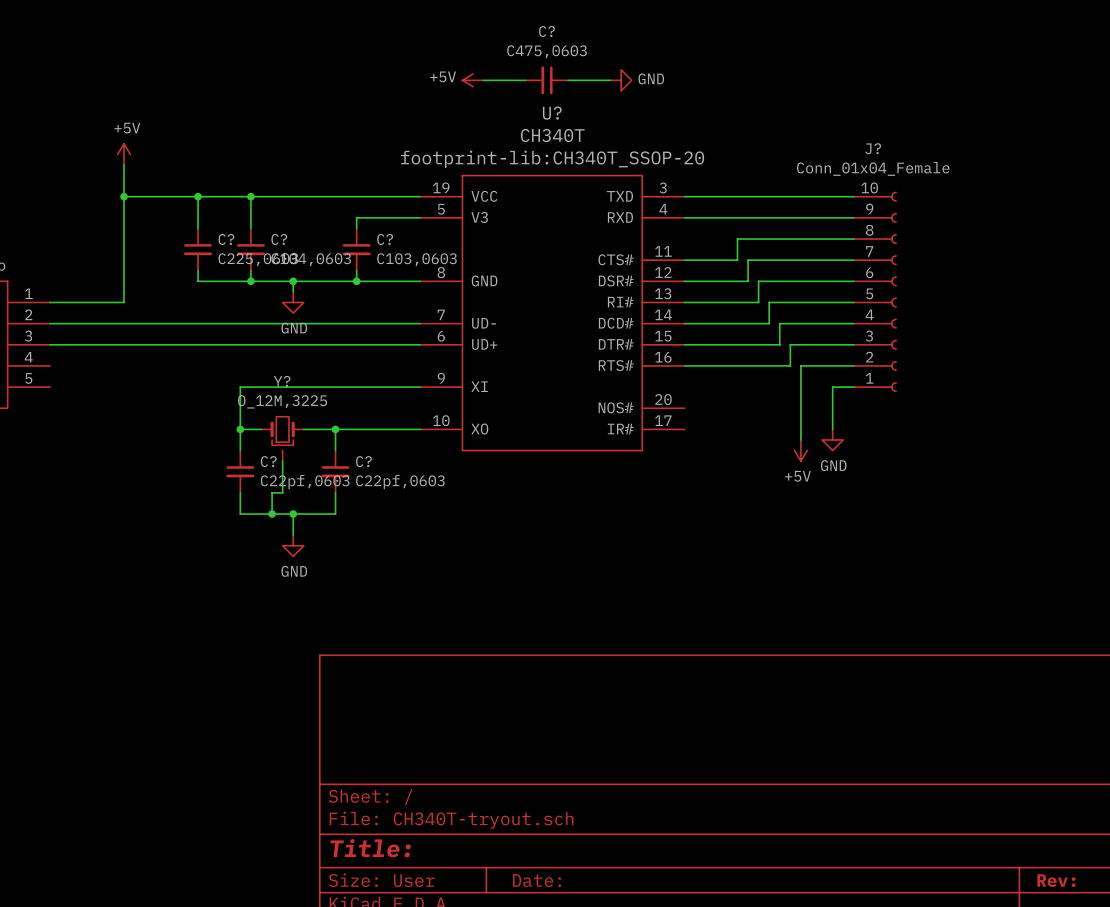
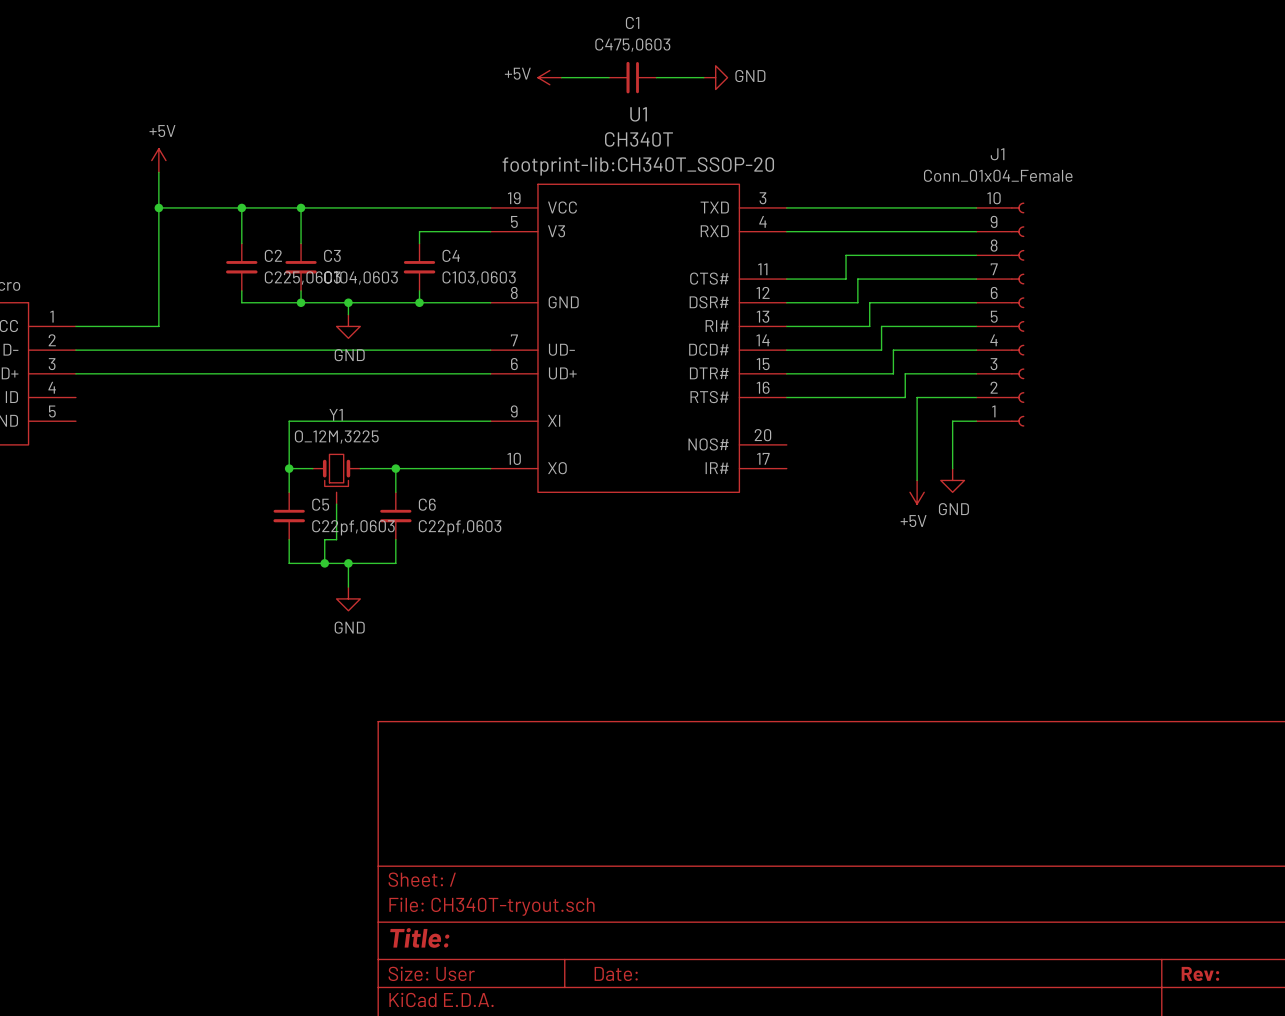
C? name: C? (546, 31) -> C1 (632, 22)
U? name: U? (552, 113) -> U1 (638, 114)
J? name: J? (873, 148) -> J1 (997, 154)
C? name: C? (226, 239) -> C2 (273, 255)
C? name: C? (279, 239) -> C3 (332, 255)
C? name: C? (385, 239) -> C4 (451, 255)
Y? name: Y? (282, 381) -> Y1 (336, 414)
C? name: C? (268, 461) -> C5 (320, 504)
C? name: C? (363, 461) -> C6 (427, 504)

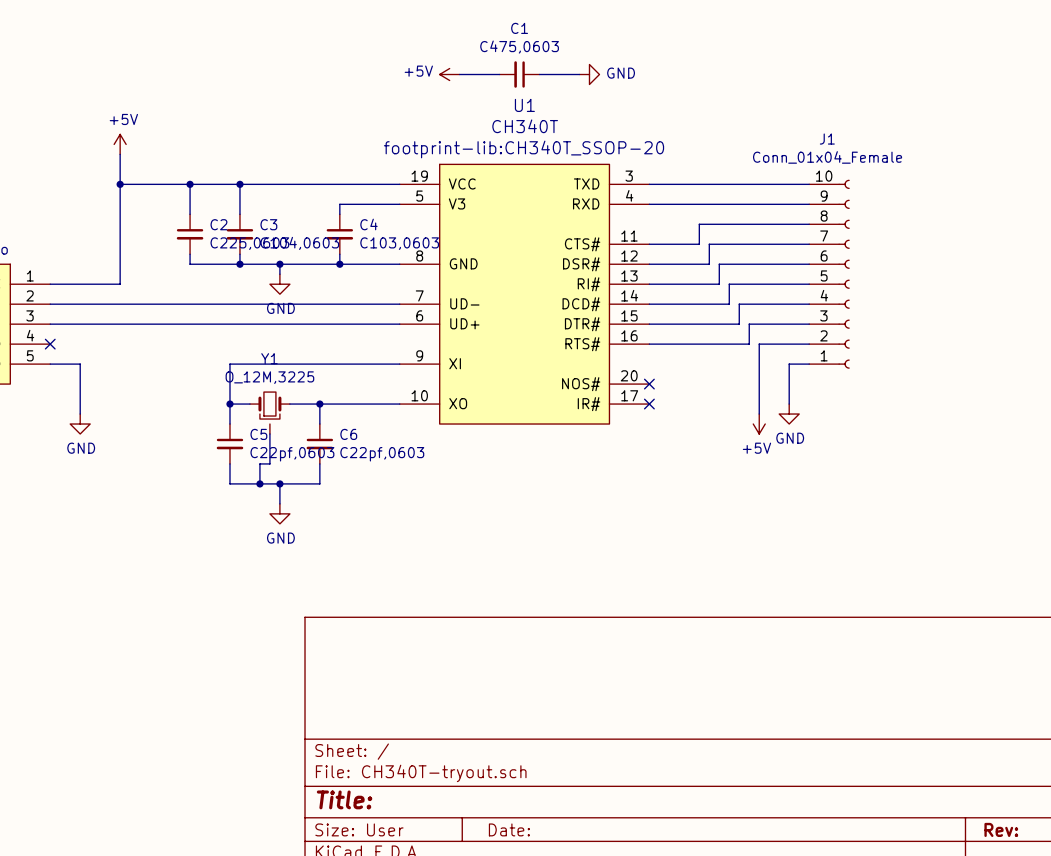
no-connect mark: none -> (50, 344)
wire: none -> (50, 364) (80, 364) (80, 414)
no-connect mark: none -> (649, 384)
no-connect mark: none -> (649, 404)
power symbol: none -> GND (80, 424)

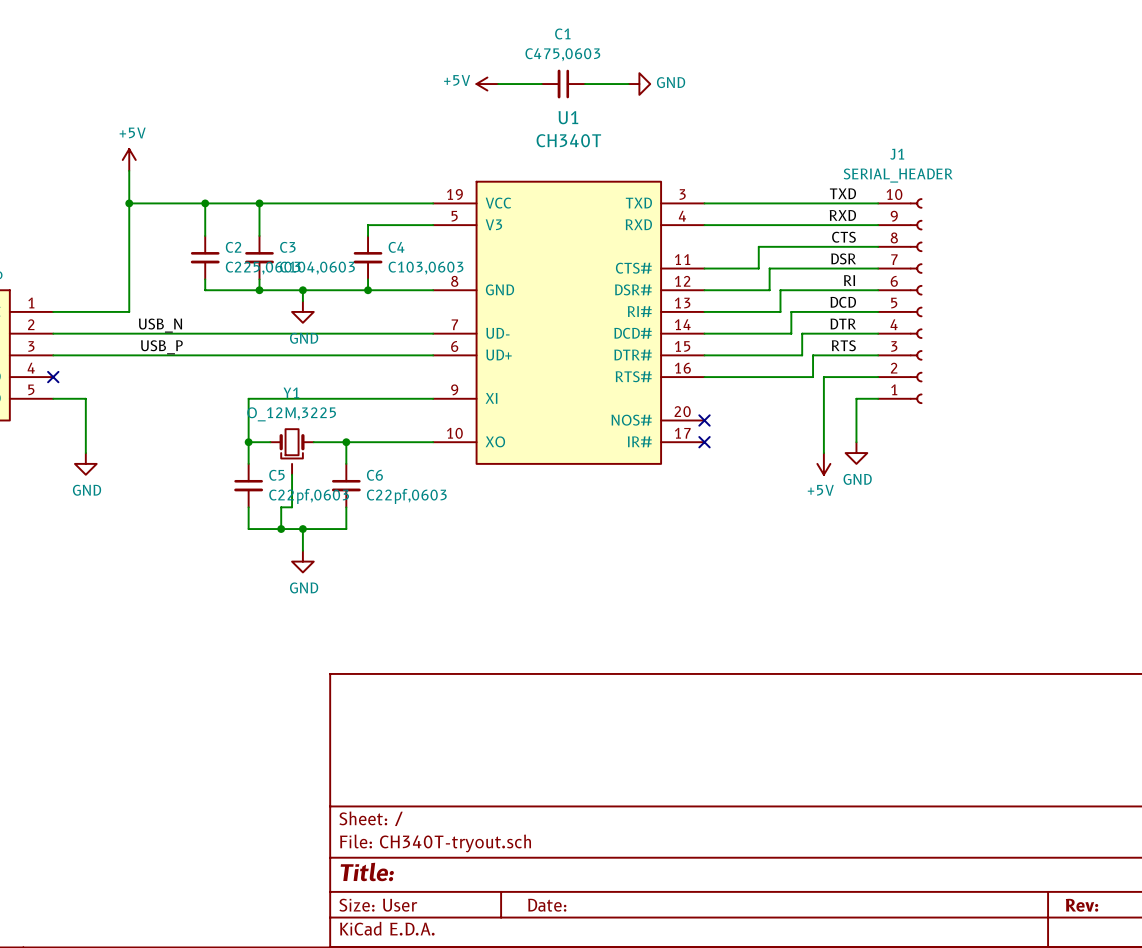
U1 text: footprint-lib:CH340T_SSOP-20 (524, 149) -> none
J1 value: Conn_01x04_Female (827, 157) -> SERIAL_HEADER (898, 175)
label: none -> TXD (842, 193)
label: none -> RXD (842, 215)
label: none -> CTS (843, 237)
label: none -> DSR (843, 258)
label: none -> RI (849, 280)
label: none -> DCD (843, 302)
label: none -> USB_N (160, 325)
label: none -> DTR (843, 324)
label: none -> USB_P (161, 347)
label: none -> RTS (843, 345)

